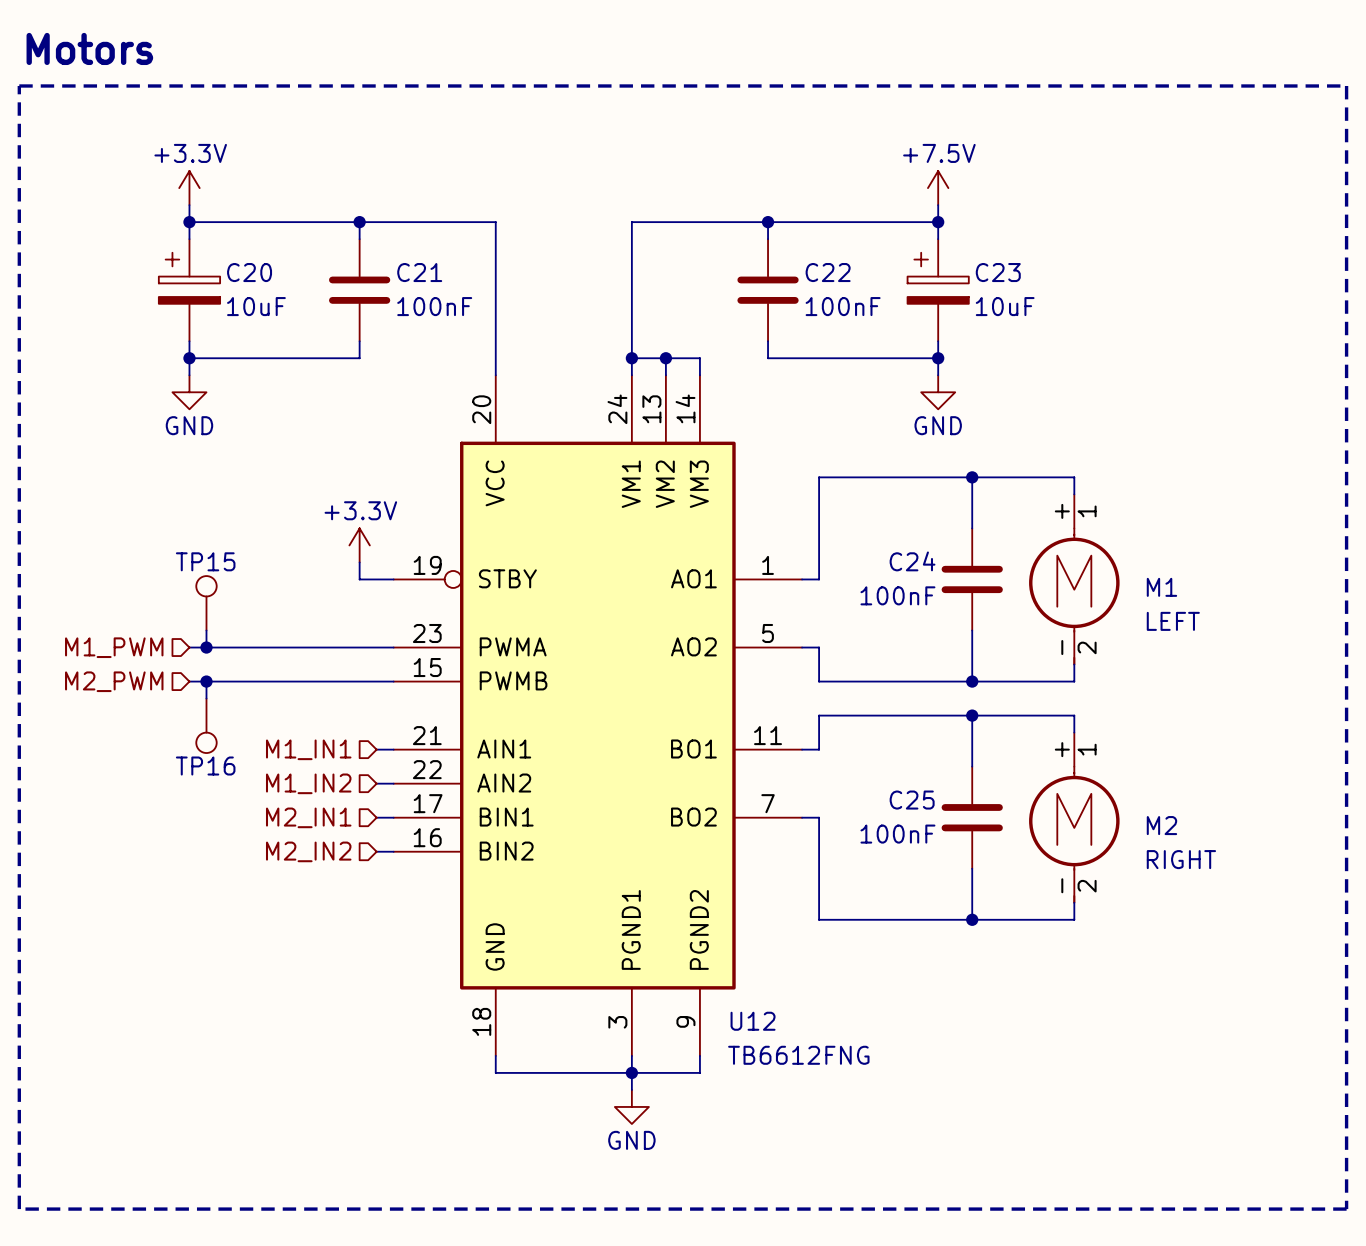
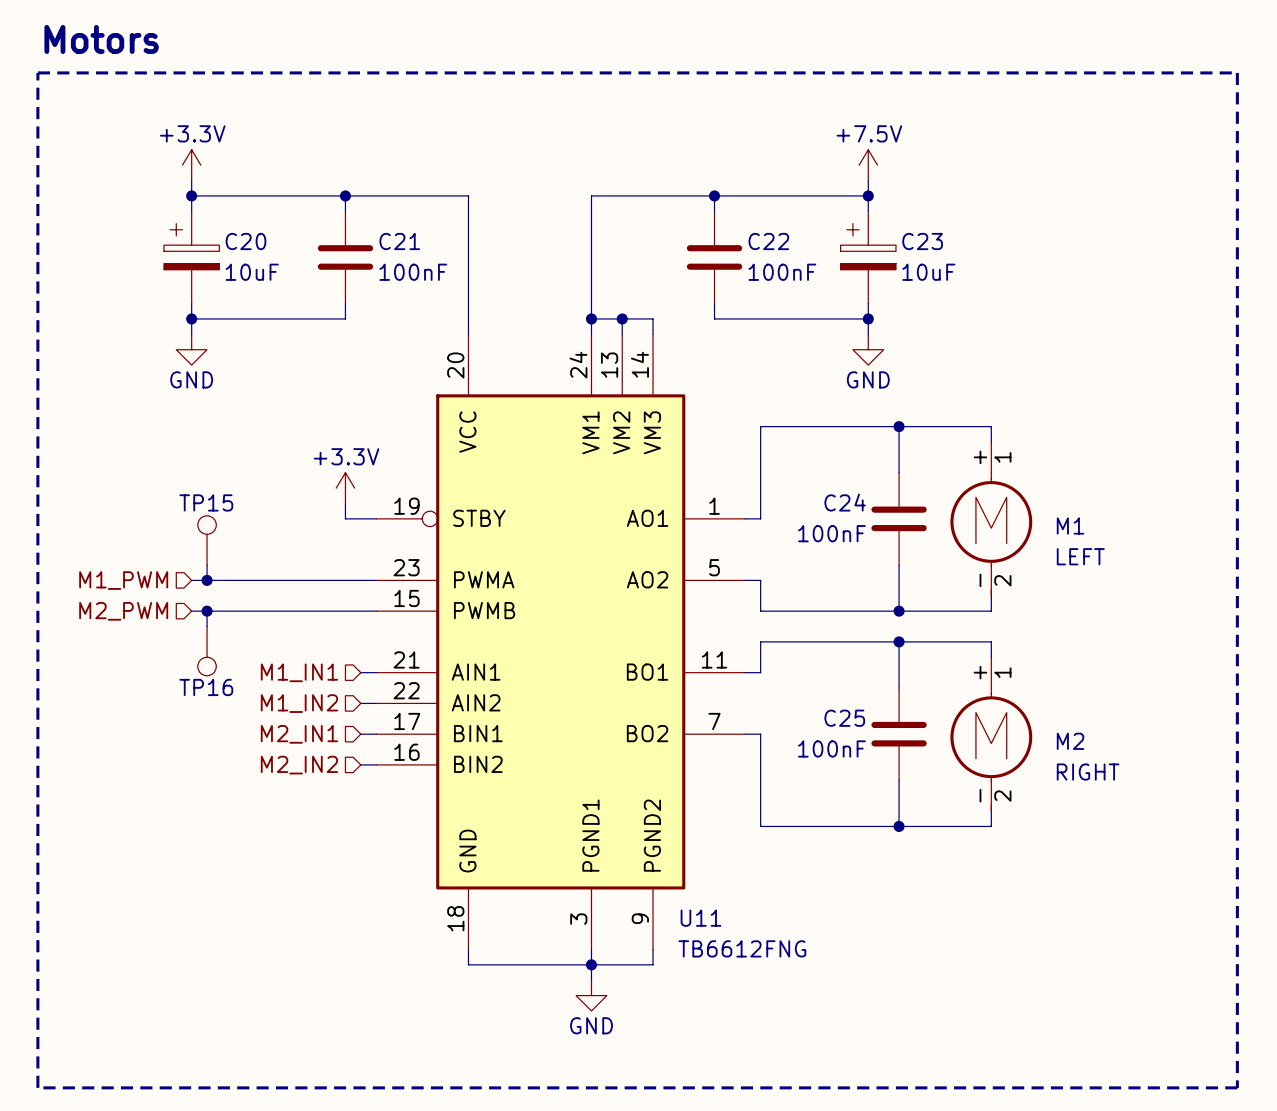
U12 name: U12 (753, 1021) -> U11 (700, 918)

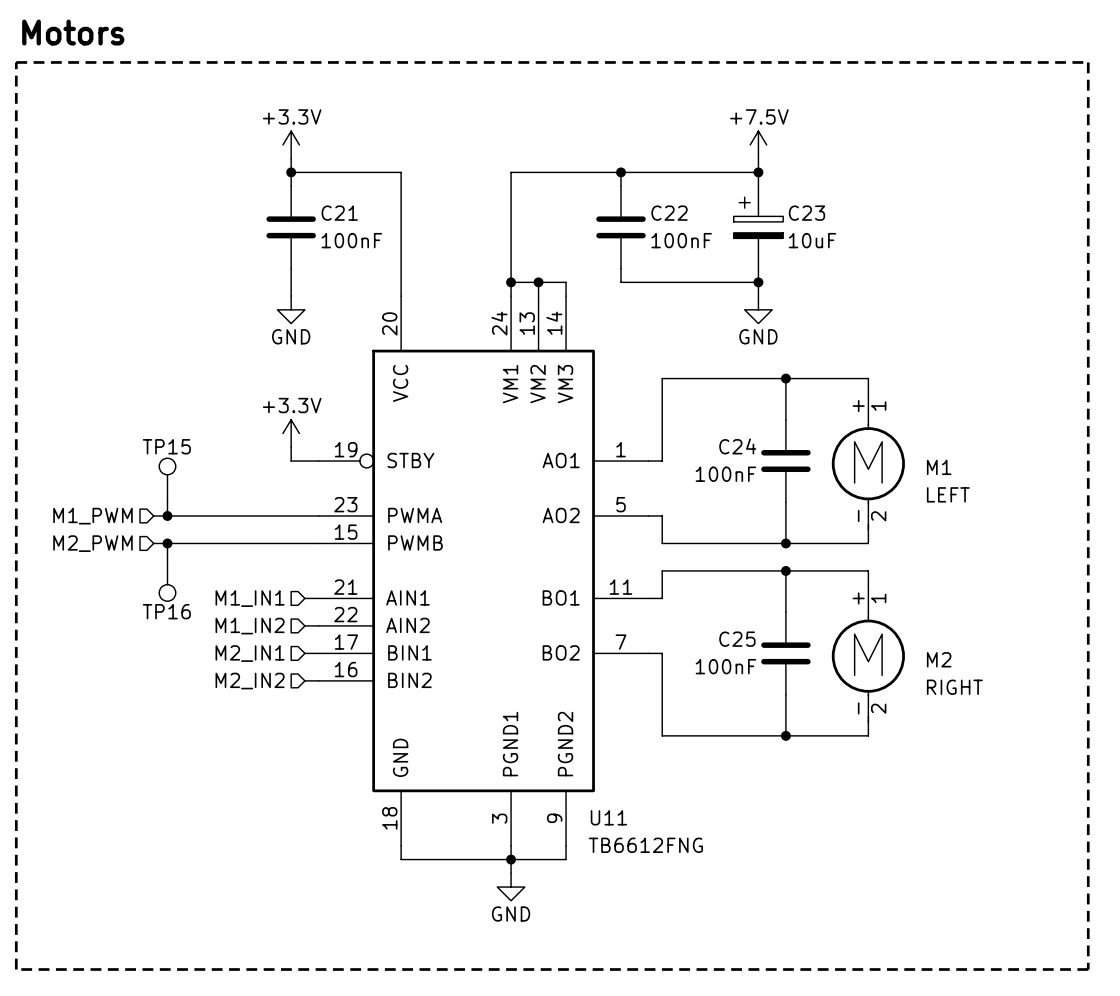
power symbol position: +3.3V (191, 165) -> +3.3V (291, 144)
wire: (191, 180) (191, 211) -> none
wire: (191, 195) (345, 195) -> (291, 158) (291, 172)
junction: (191, 195) -> none
C20: 10uF (191, 257) -> none
wire: (191, 303) (191, 334) -> none
wire: (191, 318) (345, 318) -> (291, 296) (291, 282)
junction: (191, 318) -> none
power symbol position: GND (191, 349) -> GND (291, 309)

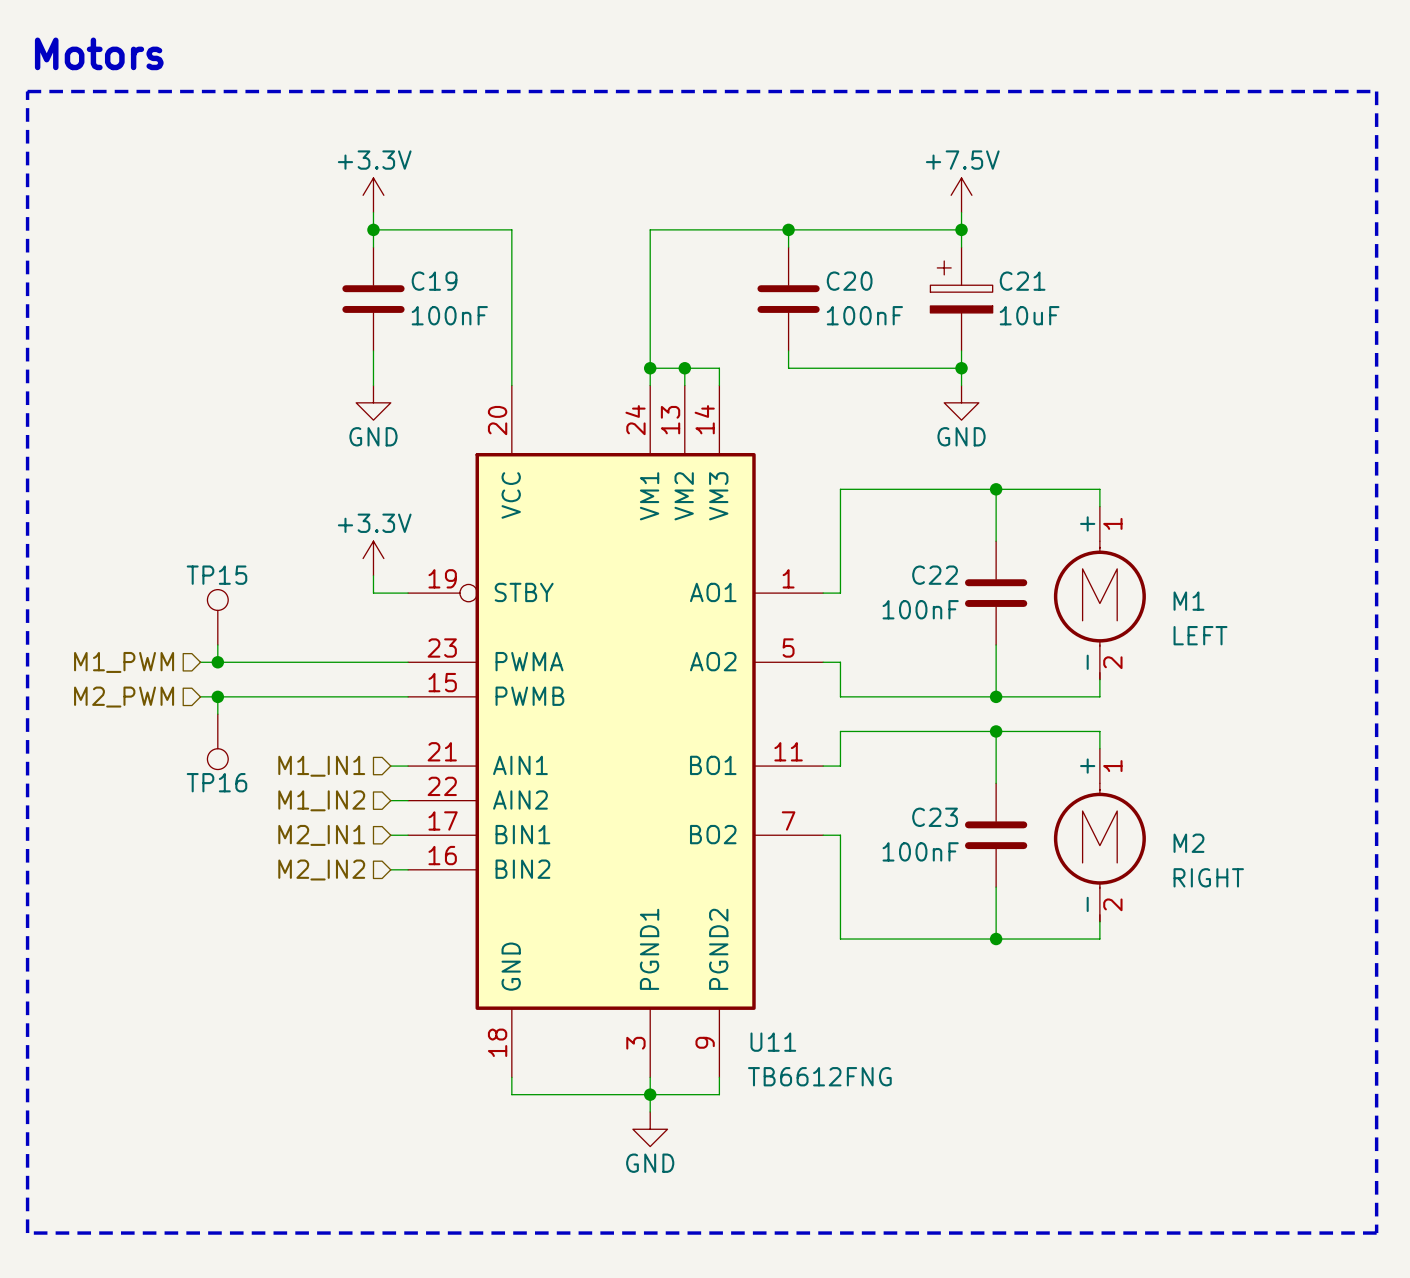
C21 name: C21 (339, 213) -> C19 (434, 281)
C22 name: C22 (669, 213) -> C20 (849, 281)
C23 name: C23 (806, 213) -> C21 (1022, 281)
C24 name: C24 (737, 446) -> C22 (935, 575)
C25 name: C25 (737, 639) -> C23 (935, 817)

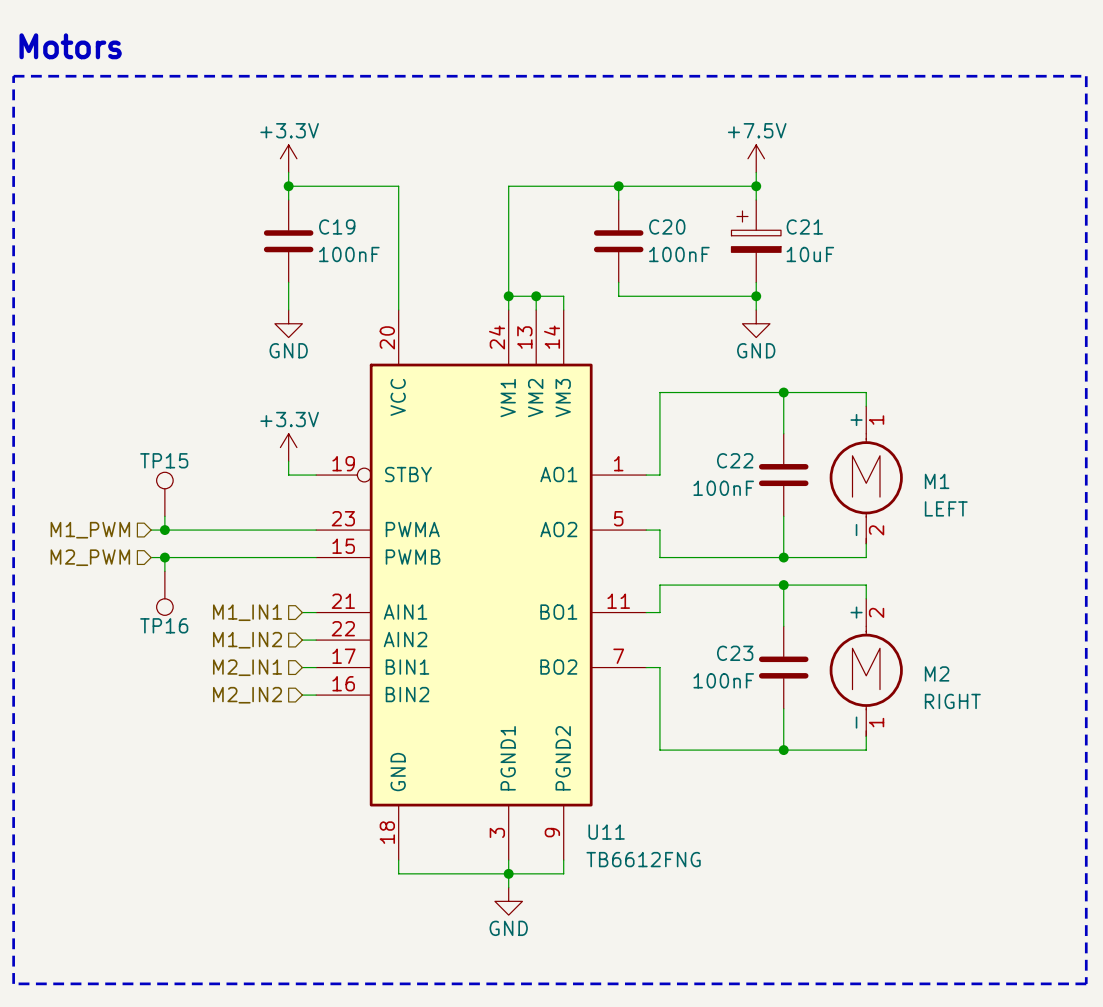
M2 pin number: 1 (1112, 766) -> 2 (876, 612)
M2 pin number: 2 (1112, 904) -> 1 (876, 722)

